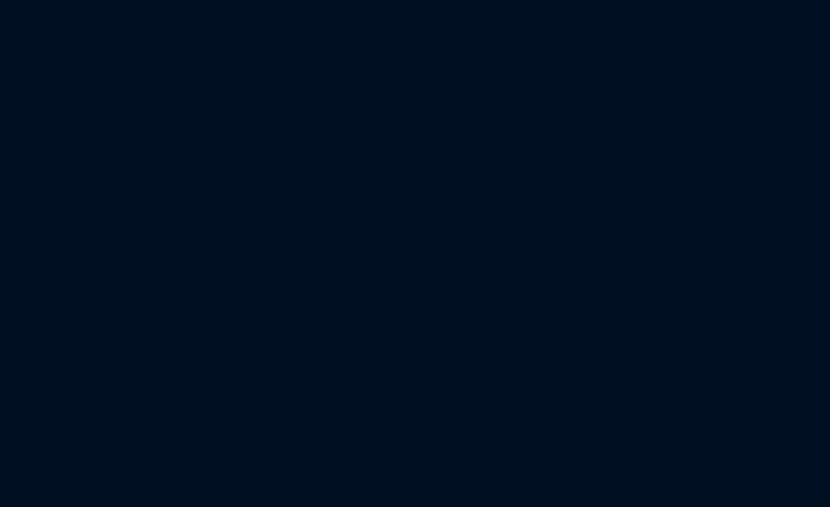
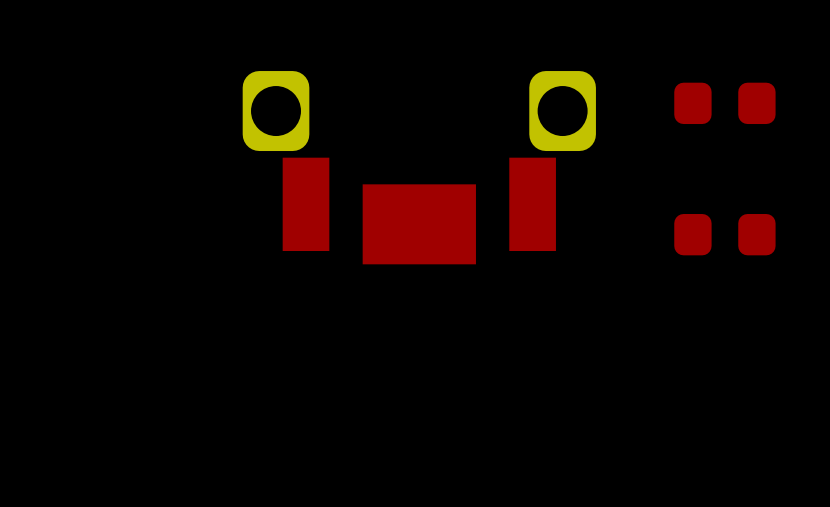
part: none -> (724, 103)
part: none -> (419, 167)
part: none -> (724, 234)

